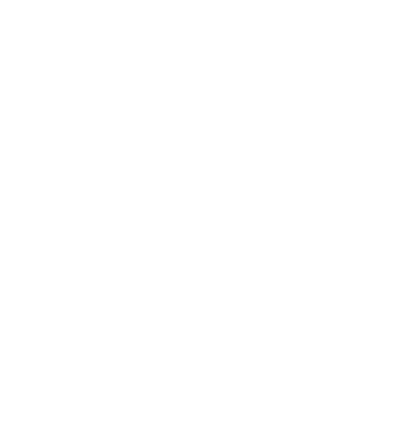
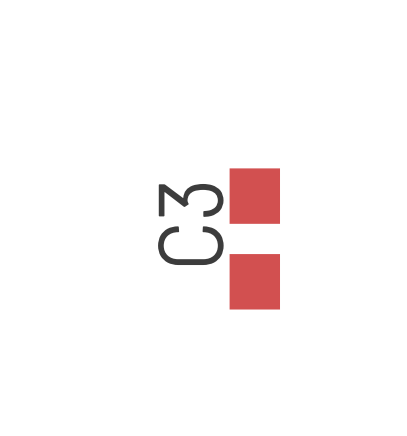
C3: none -> (254, 238)

